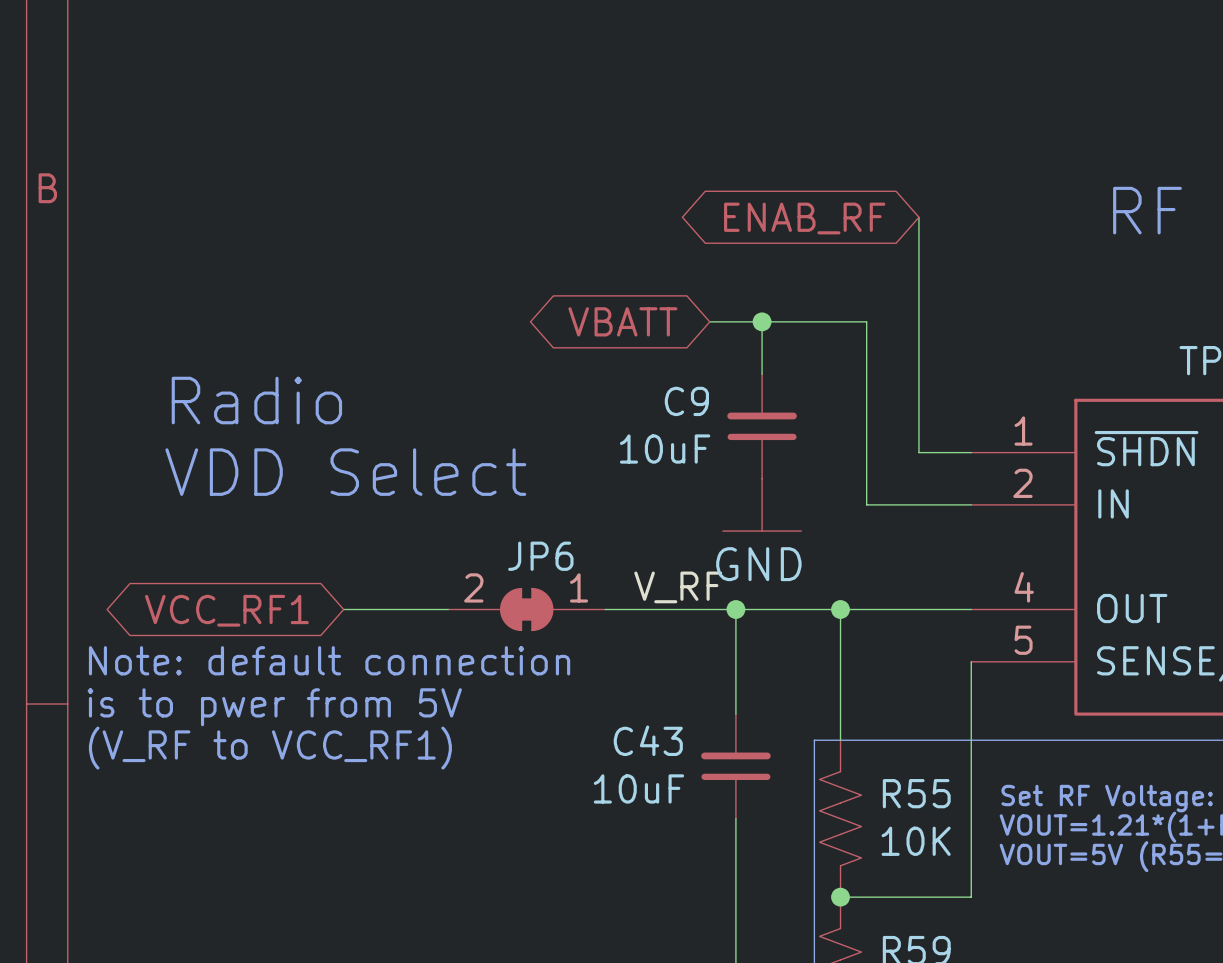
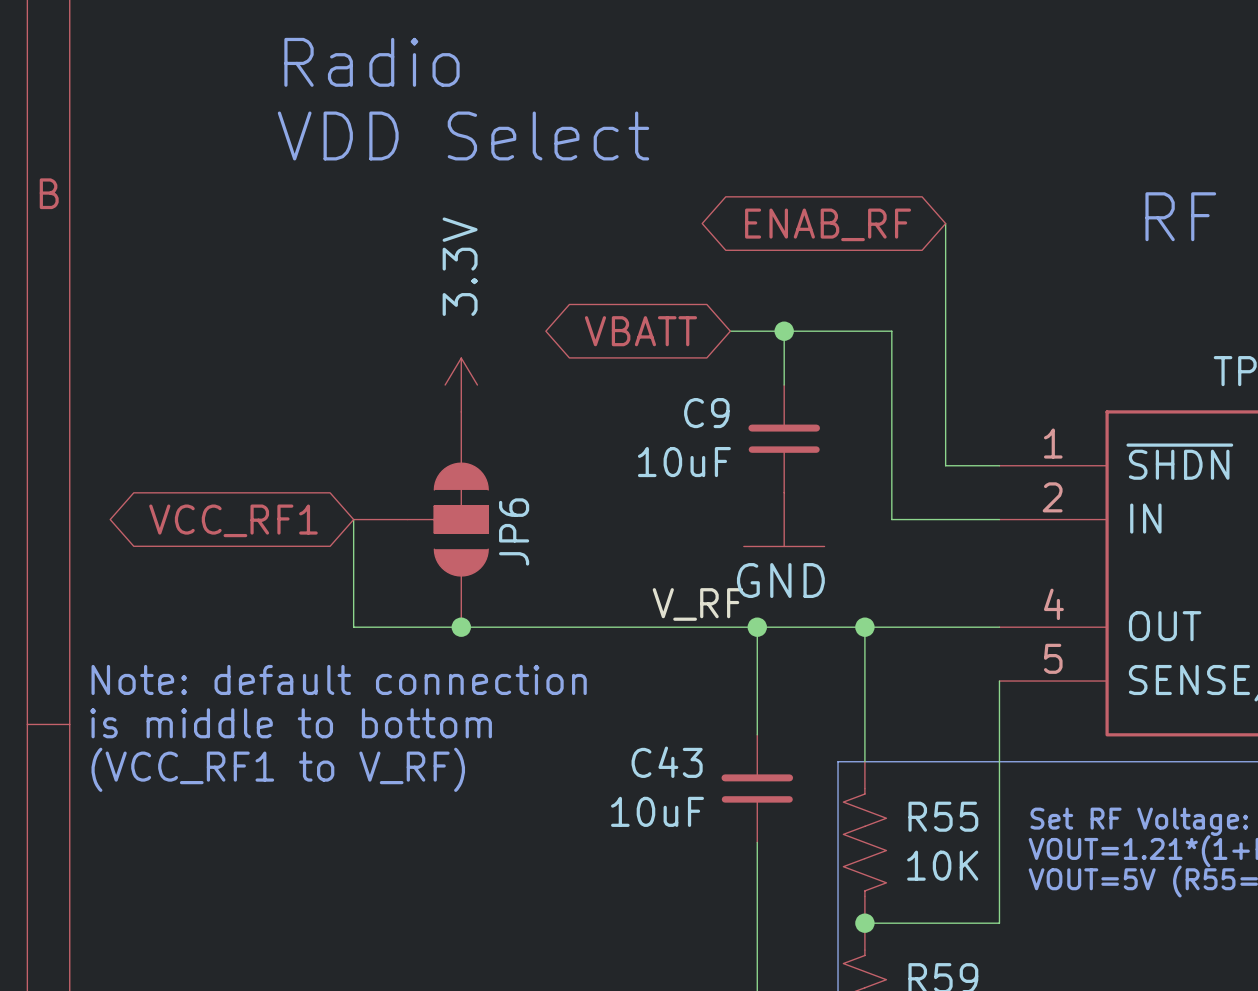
power symbol: none -> 3.3V (461, 385)
text position: Radio (256, 400) -> Radio (371, 62)
text position: VDD Select (345, 472) -> VDD Select (463, 135)
wire: none -> (353, 519) (353, 627)
JP6 name position: JP6 (540, 556) -> JP6 (514, 531)
JP6 symbol: [448, 588, 606, 631] -> [353, 411, 489, 628]
junction: none -> (461, 627)
global label position: VCC_RF1 (226, 610) -> VCC_RF1 (233, 520)
text: is to pwer from 5V (274, 707) -> is middle to bottom (291, 723)
text: (V_RF to VCC_RF1) (270, 748) -> (VCC_RF1 to V_RF) (278, 769)

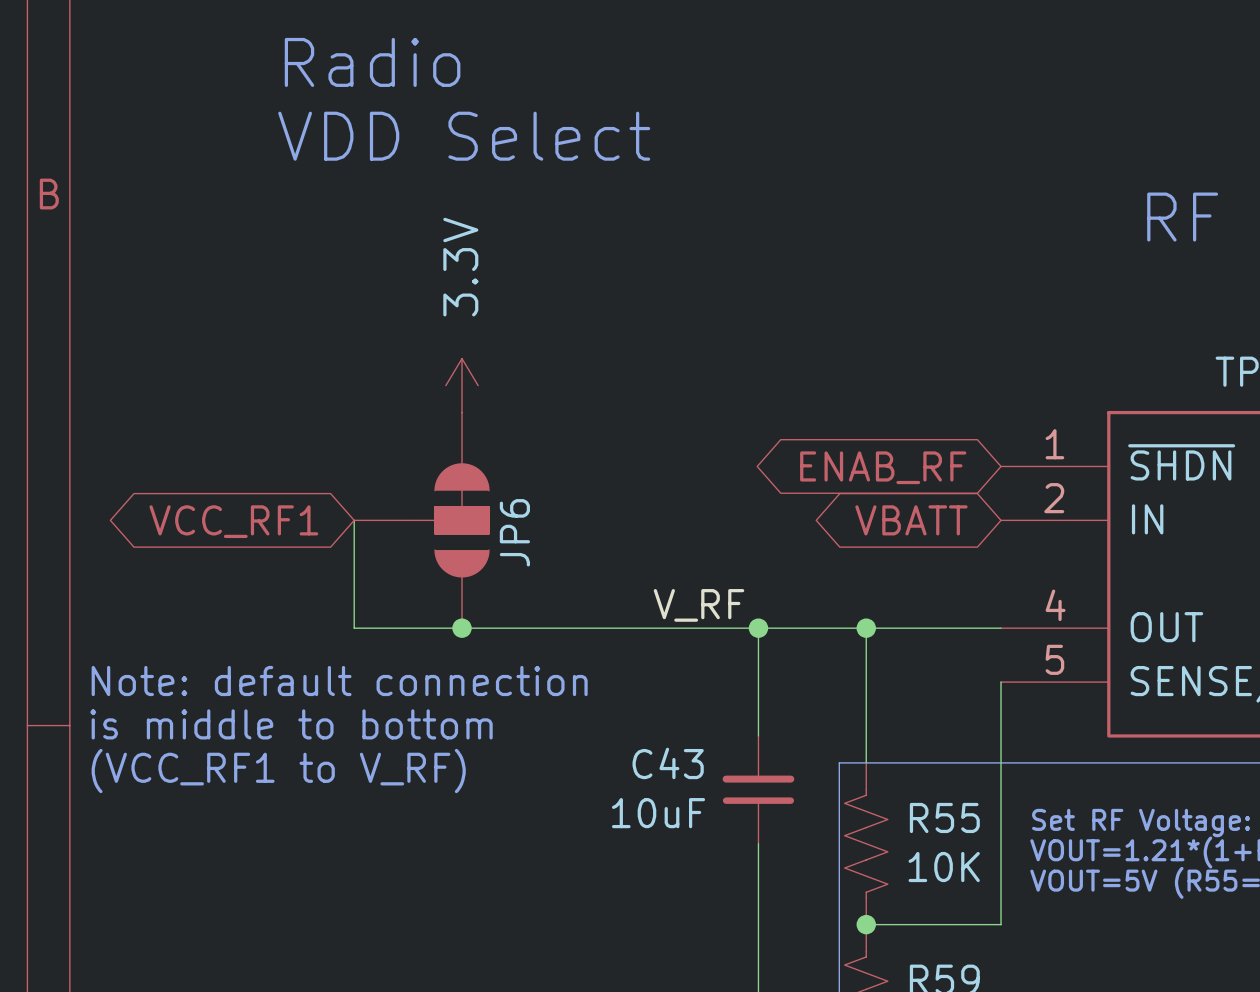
wire: (945, 223) (945, 465) (999, 465) -> none
global label position: ENAB_RF (828, 224) -> ENAB_RF (883, 467)
global label position: VBATT (640, 331) -> VBATT (911, 520)
wire: (730, 331) (891, 331) (891, 519) (999, 519) -> none
wire: (784, 331) (784, 385) -> none
junction: (784, 331) -> none
C9: 10uF (784, 438) -> none
power symbol: GND (784, 519) -> none

